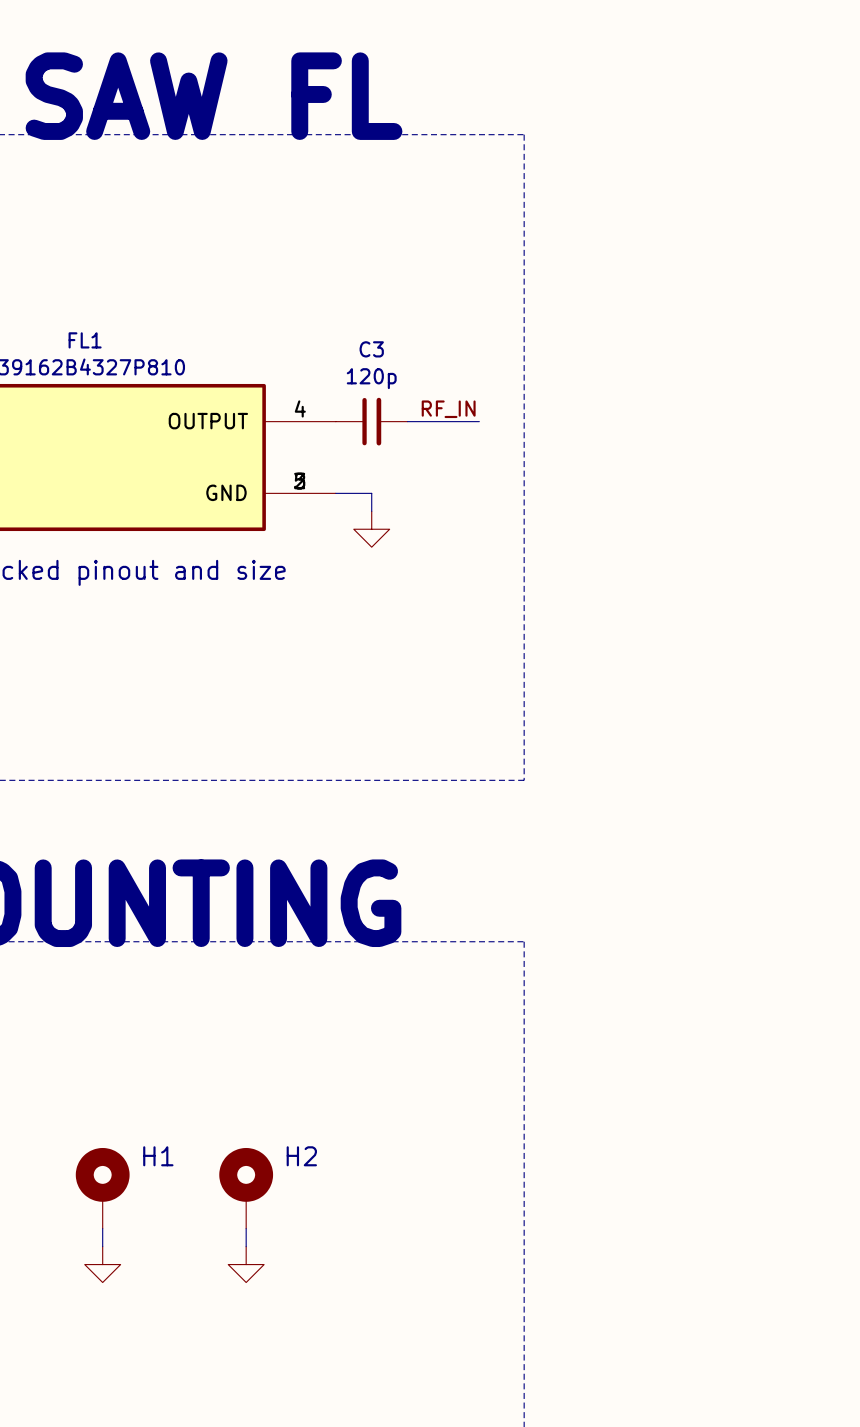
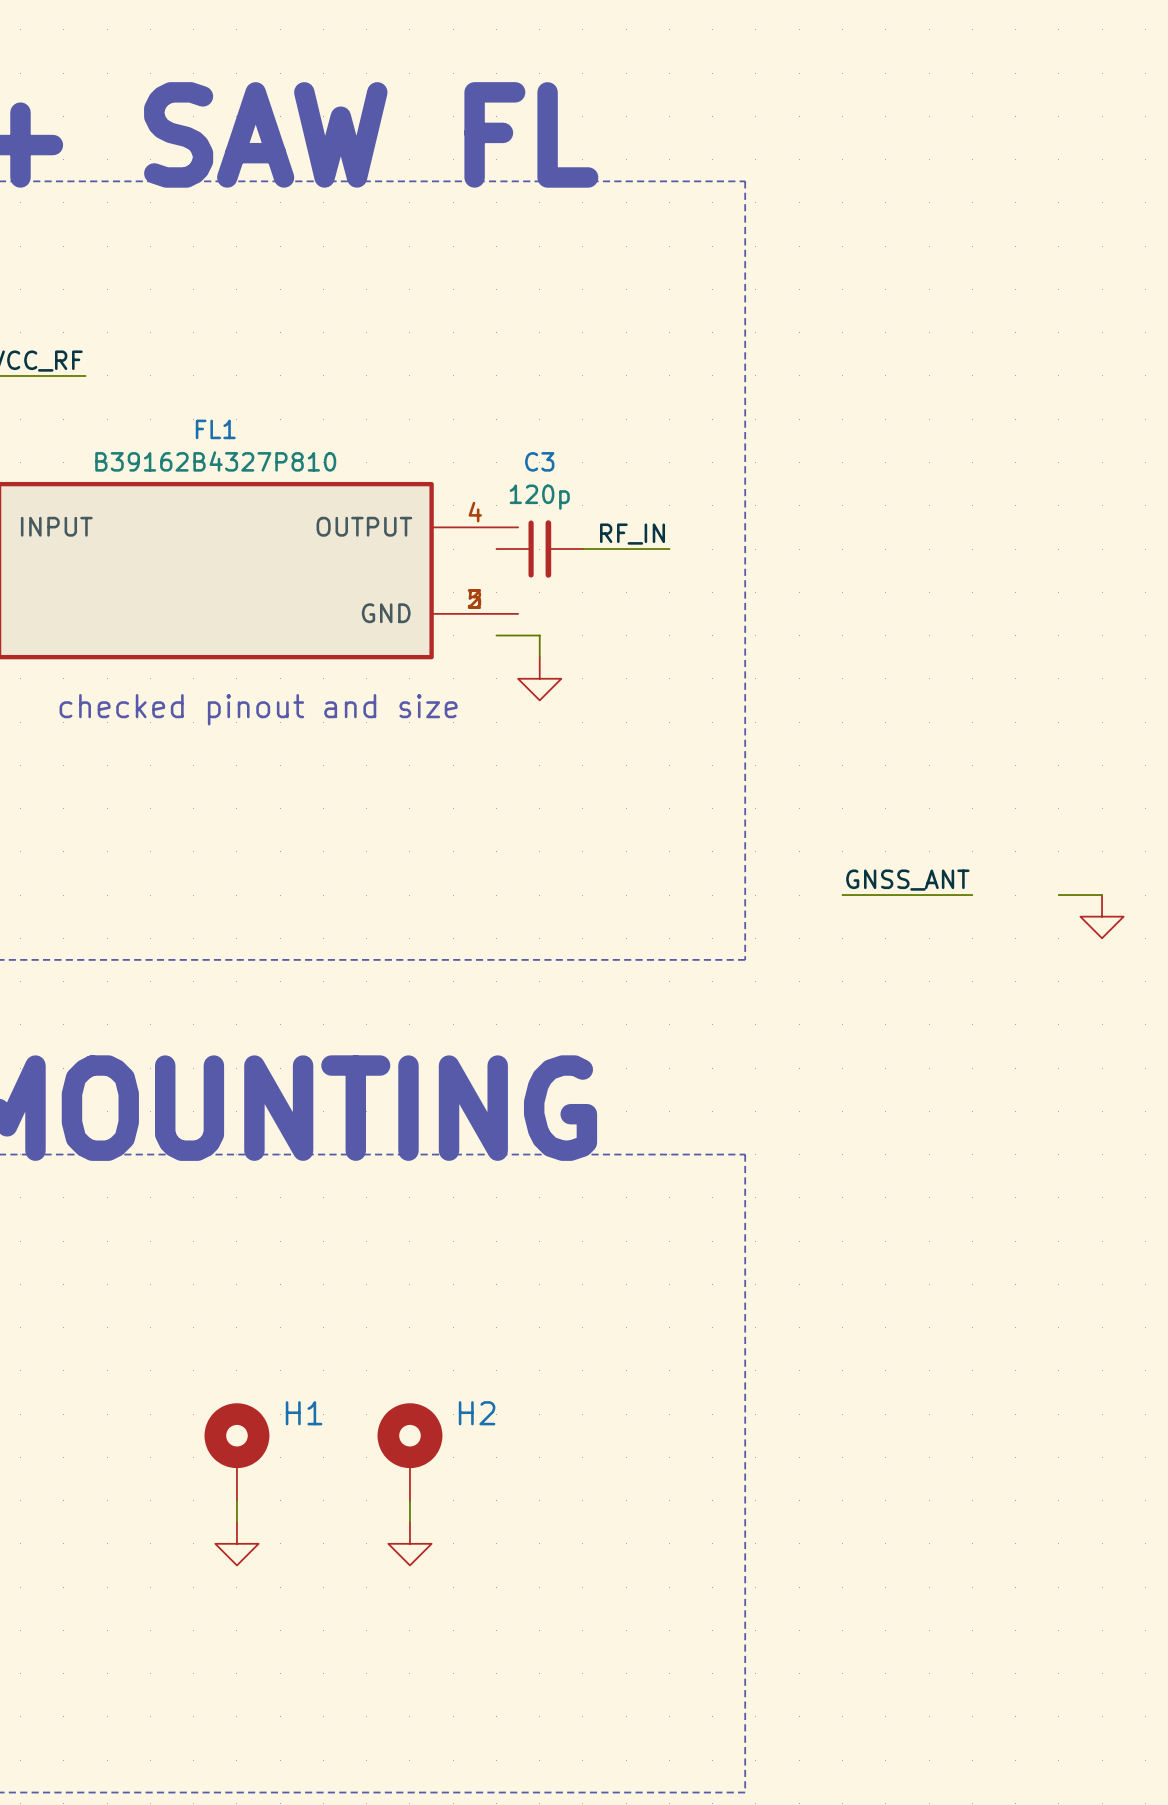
label position: RF_IN (448, 409) -> RF_IN (632, 534)
C3 position: (371, 421) -> (539, 549)
wire: (407, 421) (479, 421) -> (582, 549) (669, 549)
wire: (335, 493) (371, 493) (371, 511) -> (496, 635) (539, 635) (539, 657)
power symbol position: (371, 529) -> (539, 678)
label: none -> GNSS_ANT (907, 880)
wire: none -> (842, 895) (972, 895)
wire: none -> (1058, 895) (1102, 895)
power symbol: none -> (1102, 916)

